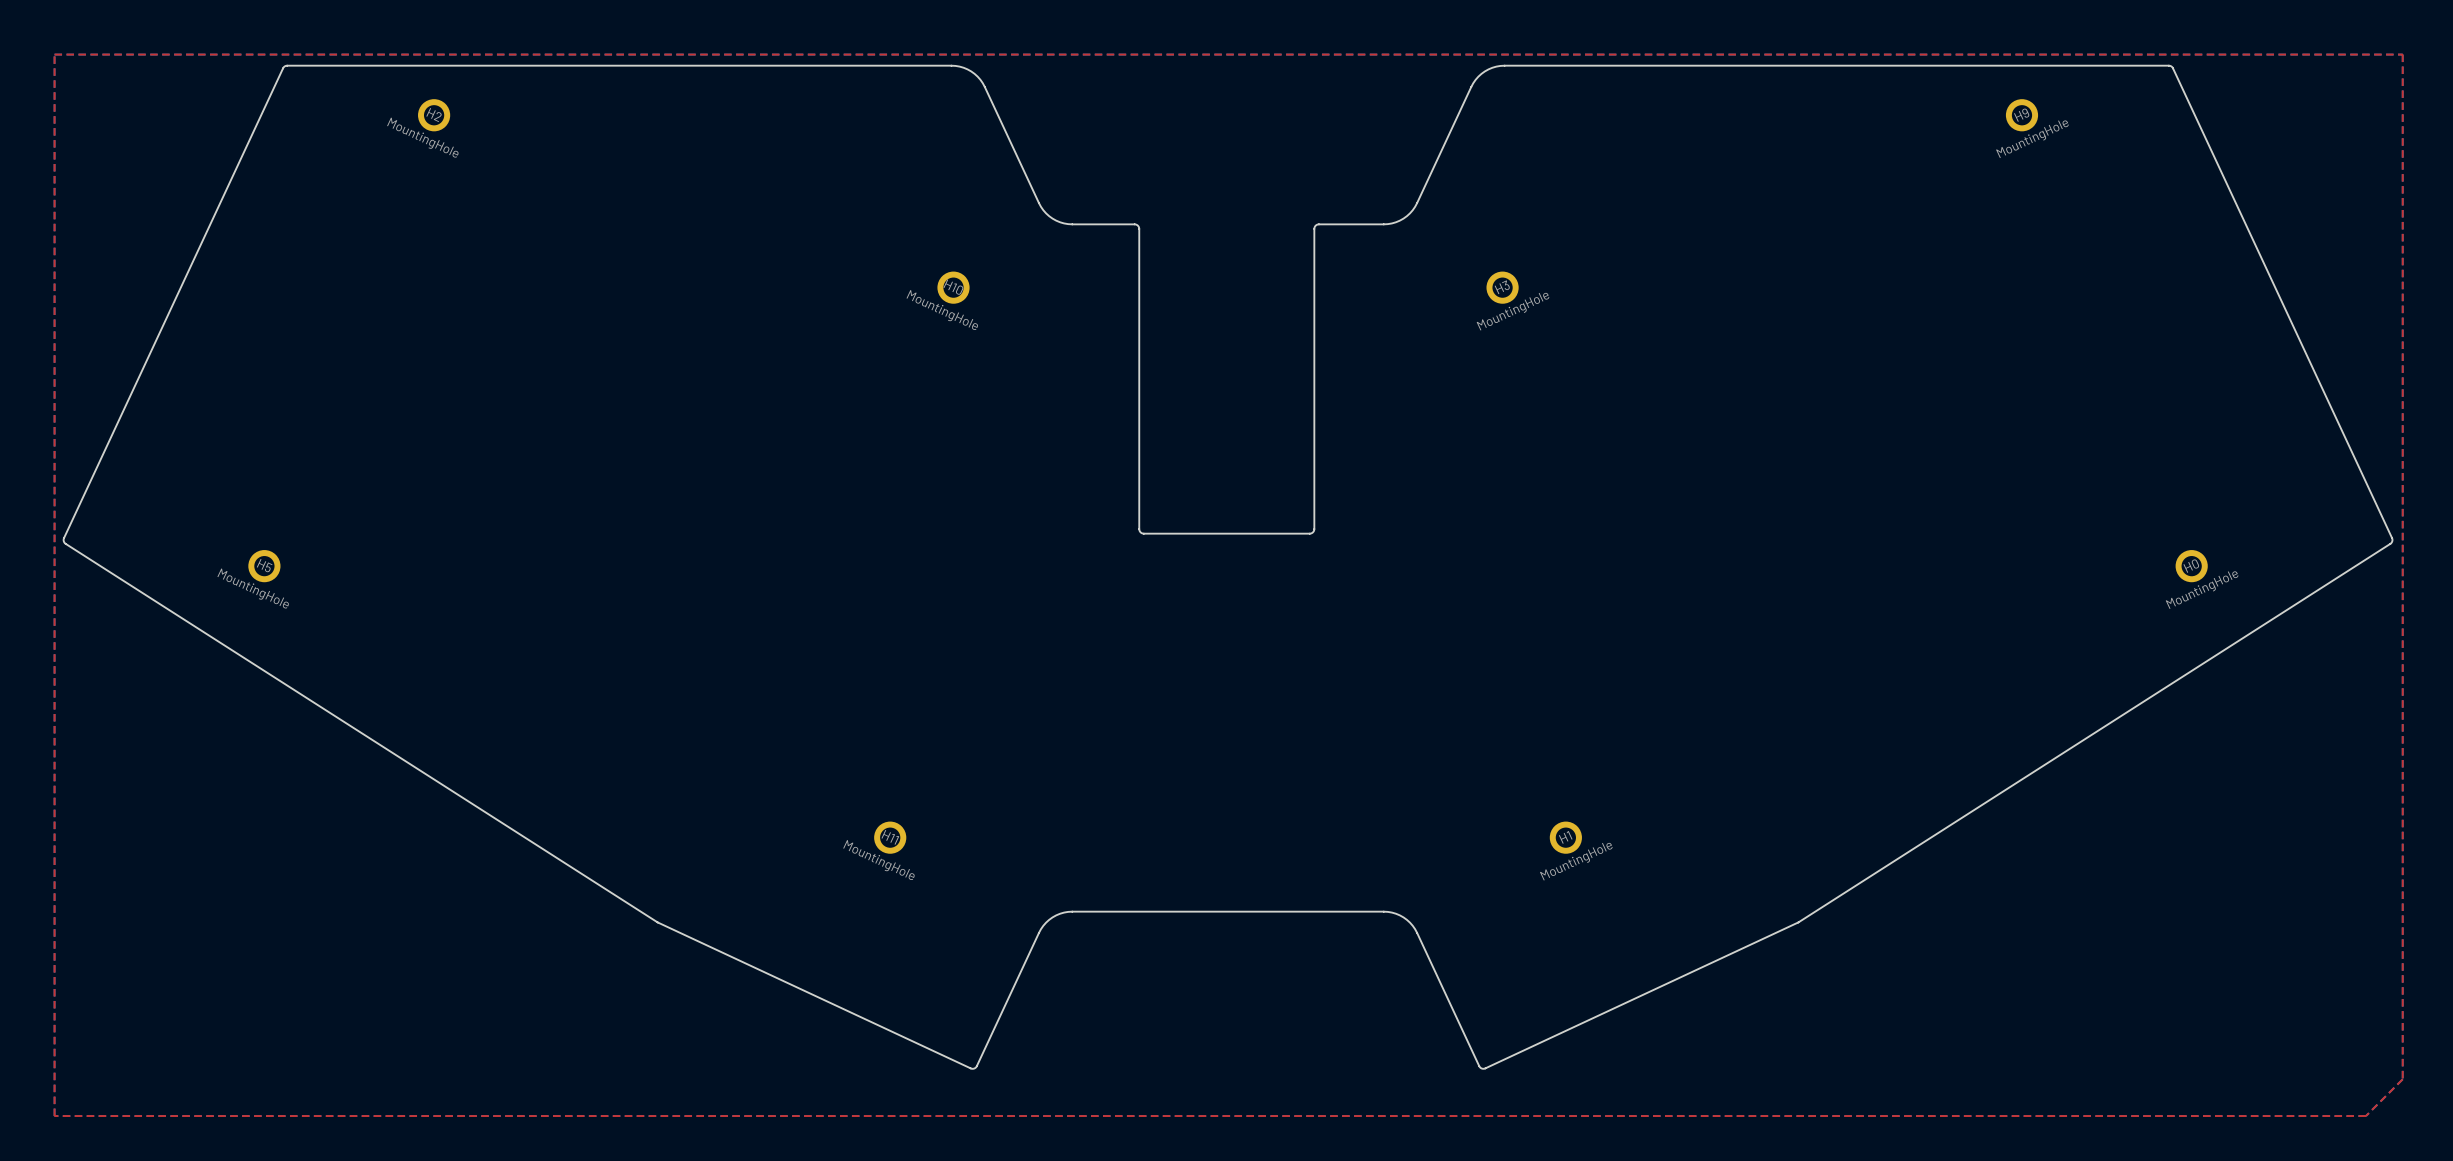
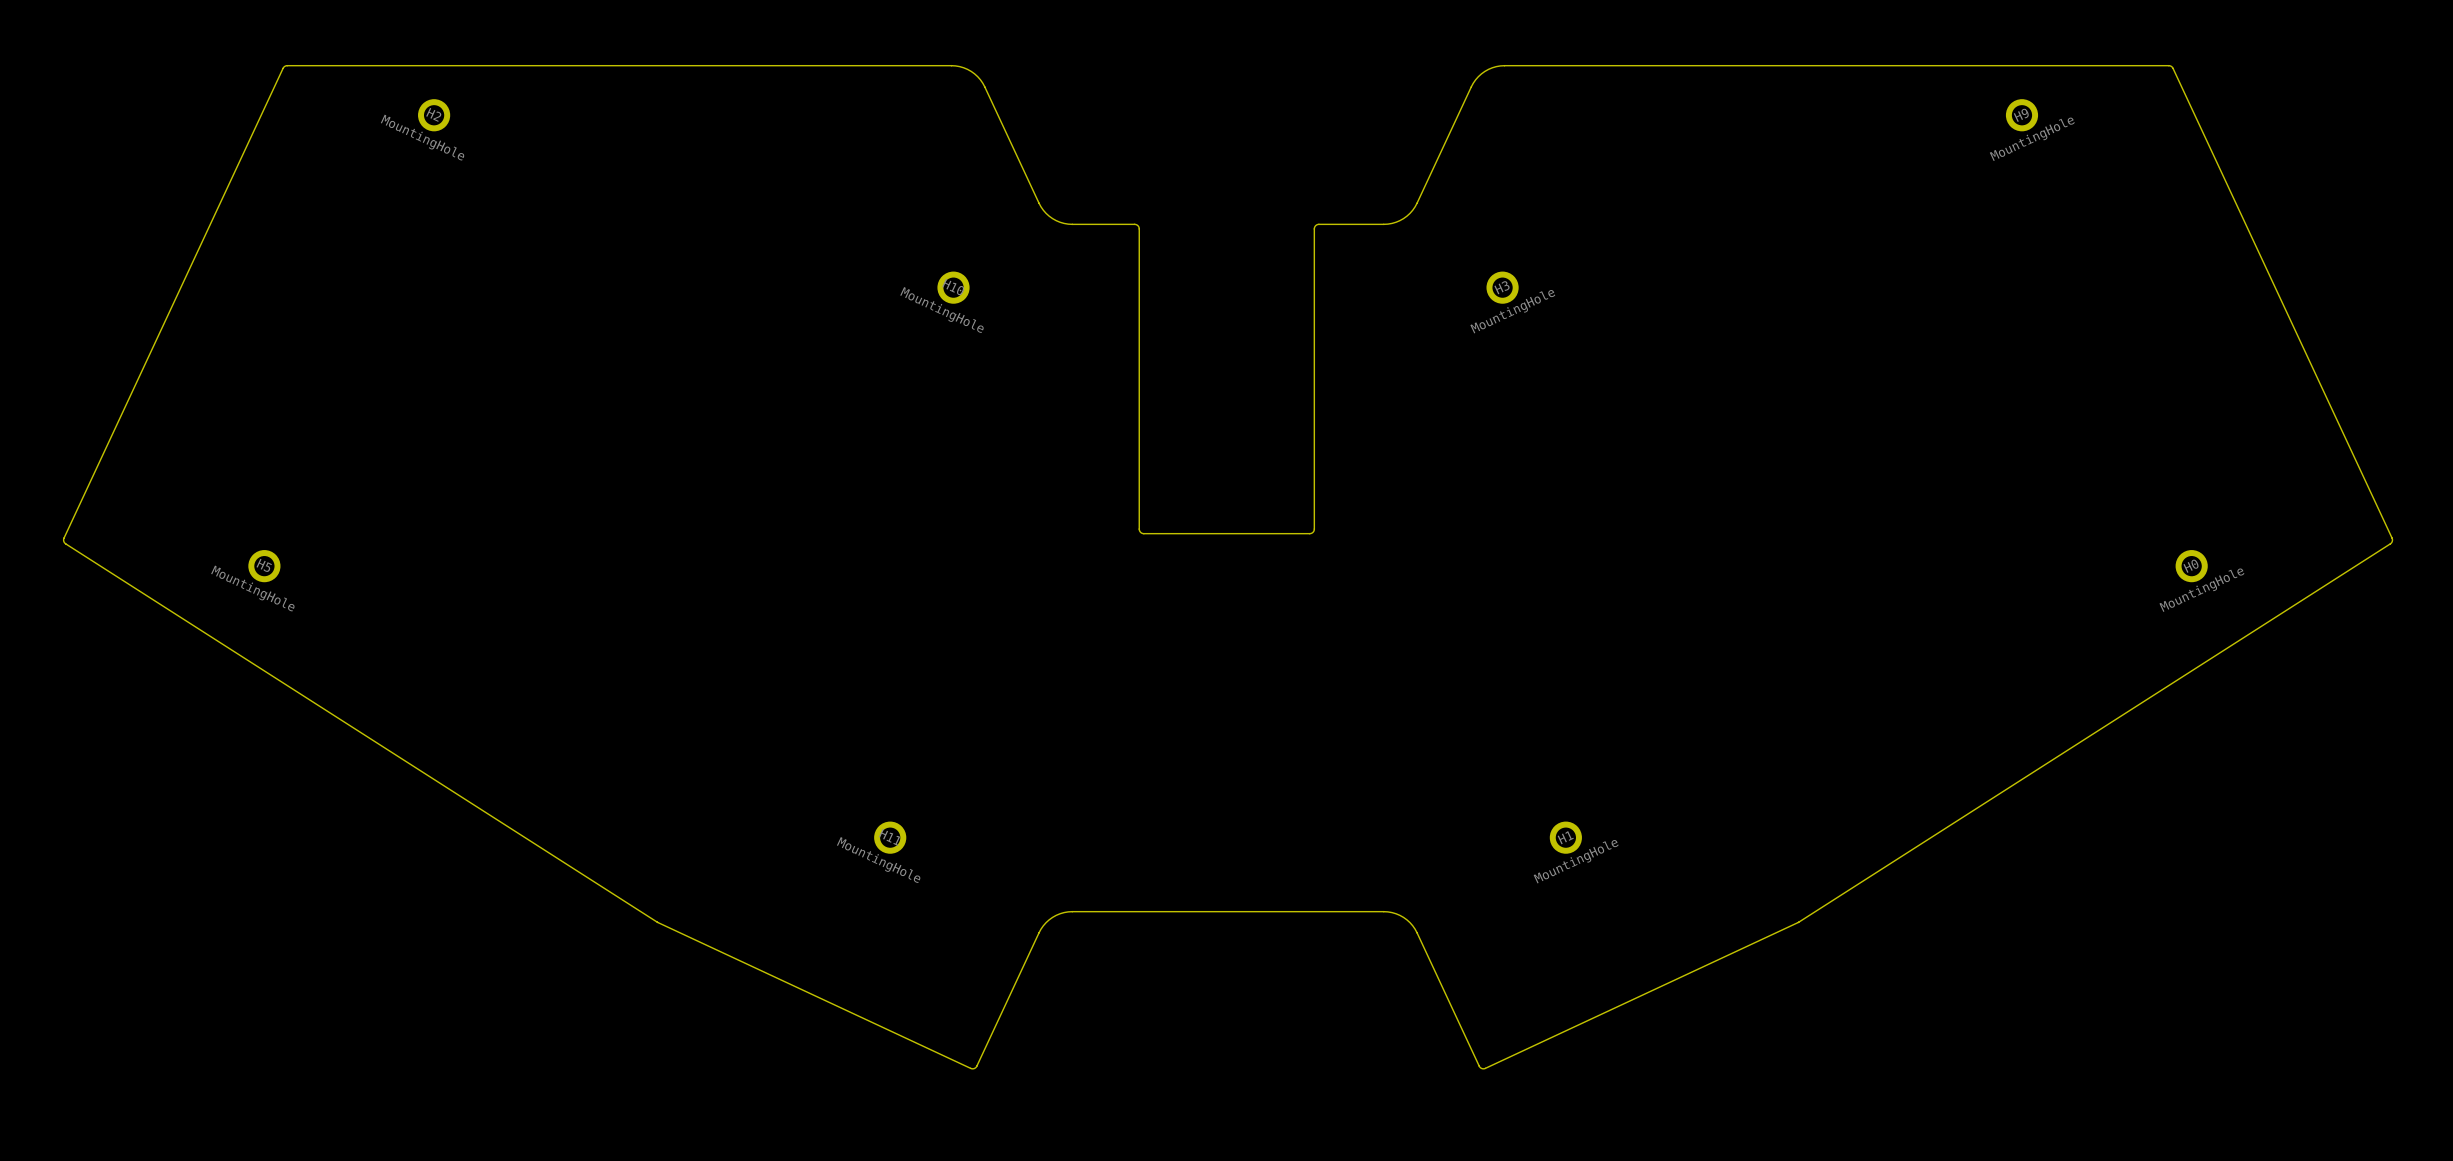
top zone outline: (54, 54) (2402, 54) (2402, 1079) (2365, 1116) (54, 1116) (54, 54) -> none

